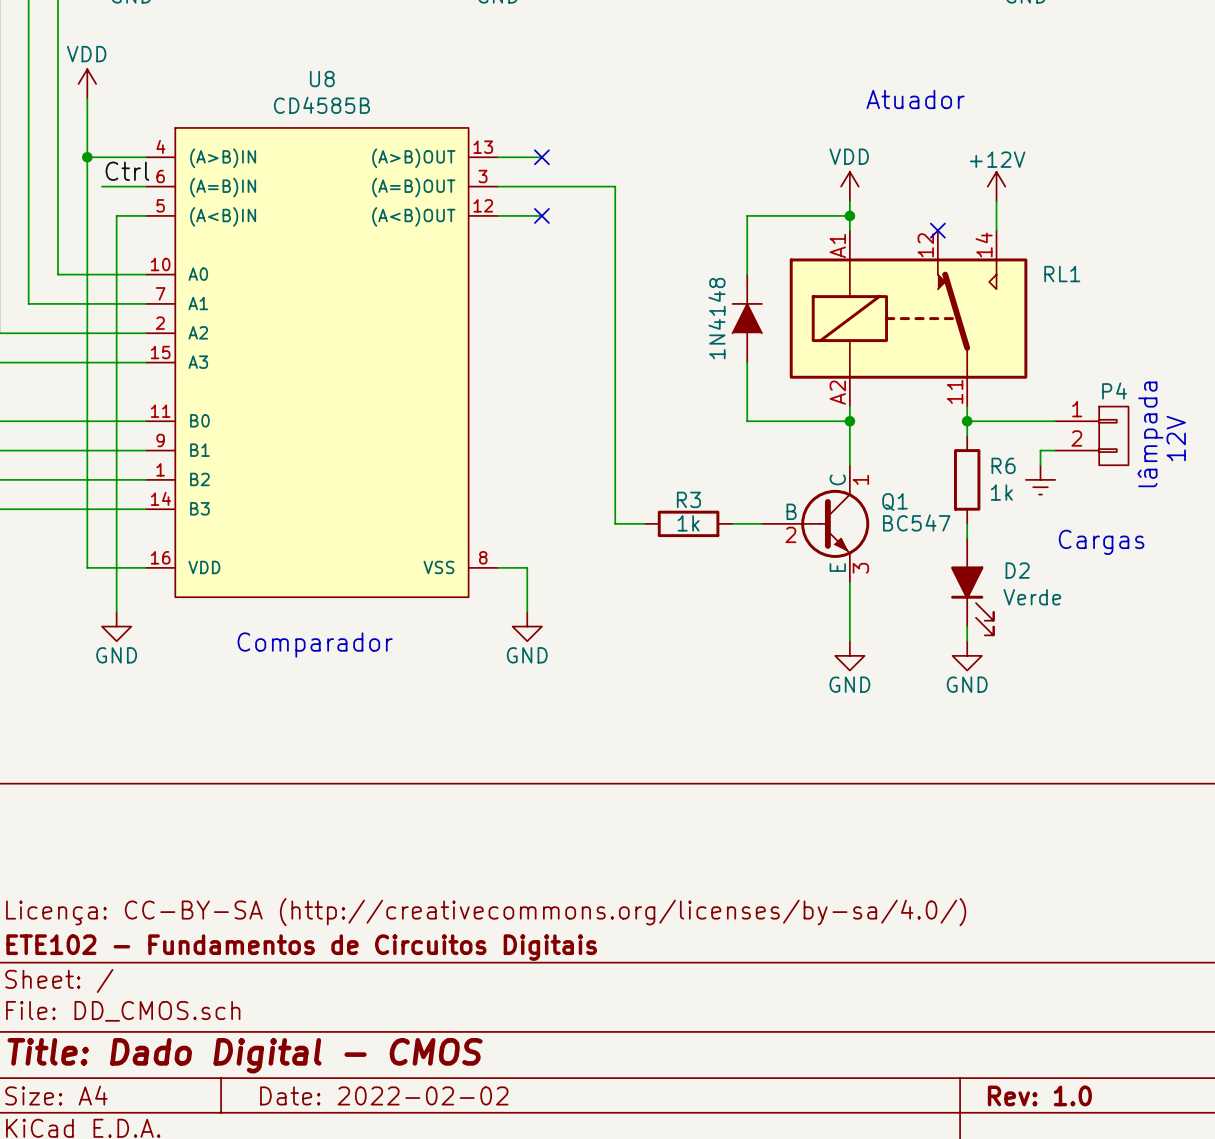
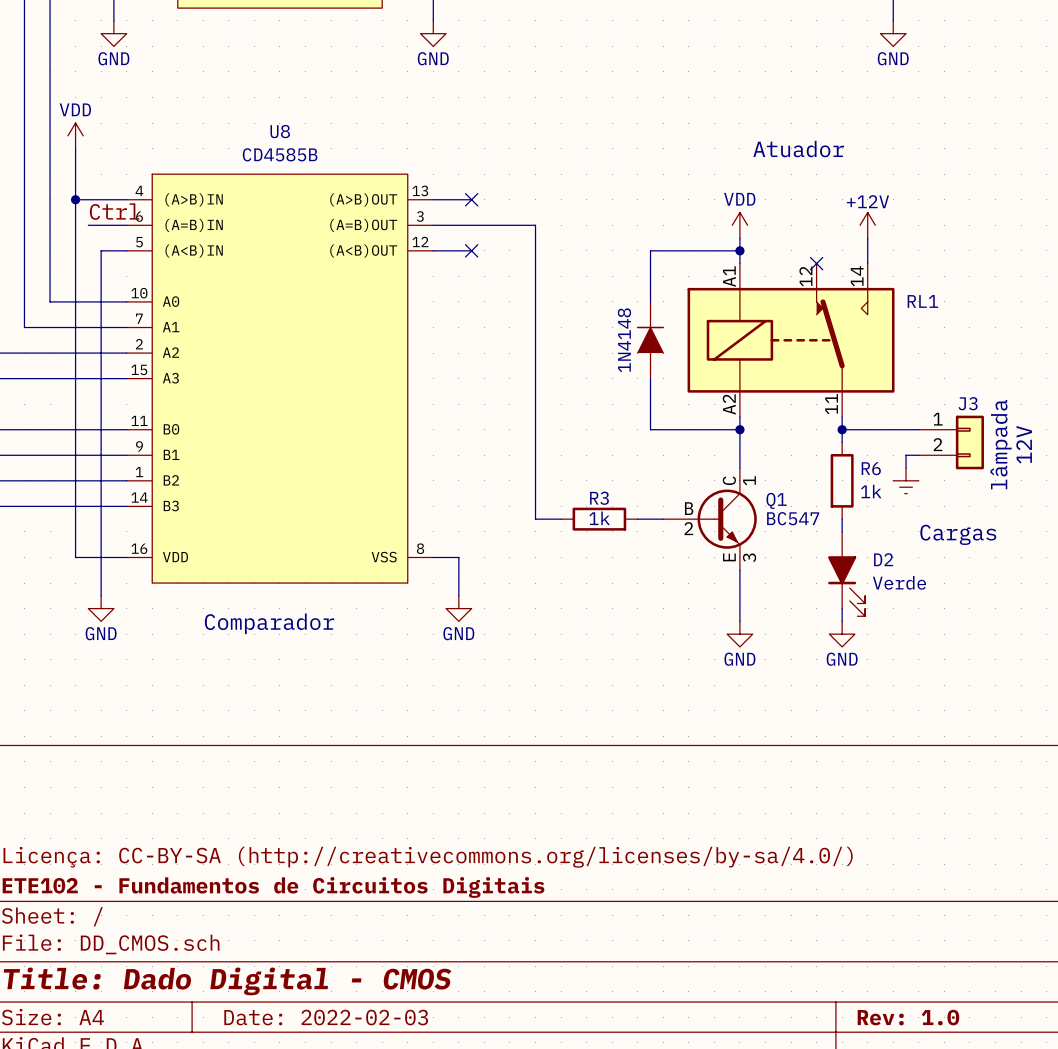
P4: (1091, 435) -> none
J3: none -> (951, 442)
title block: Date: 2022-02-02 (384, 1095) -> Date: 2022-02-03 (326, 1017)

